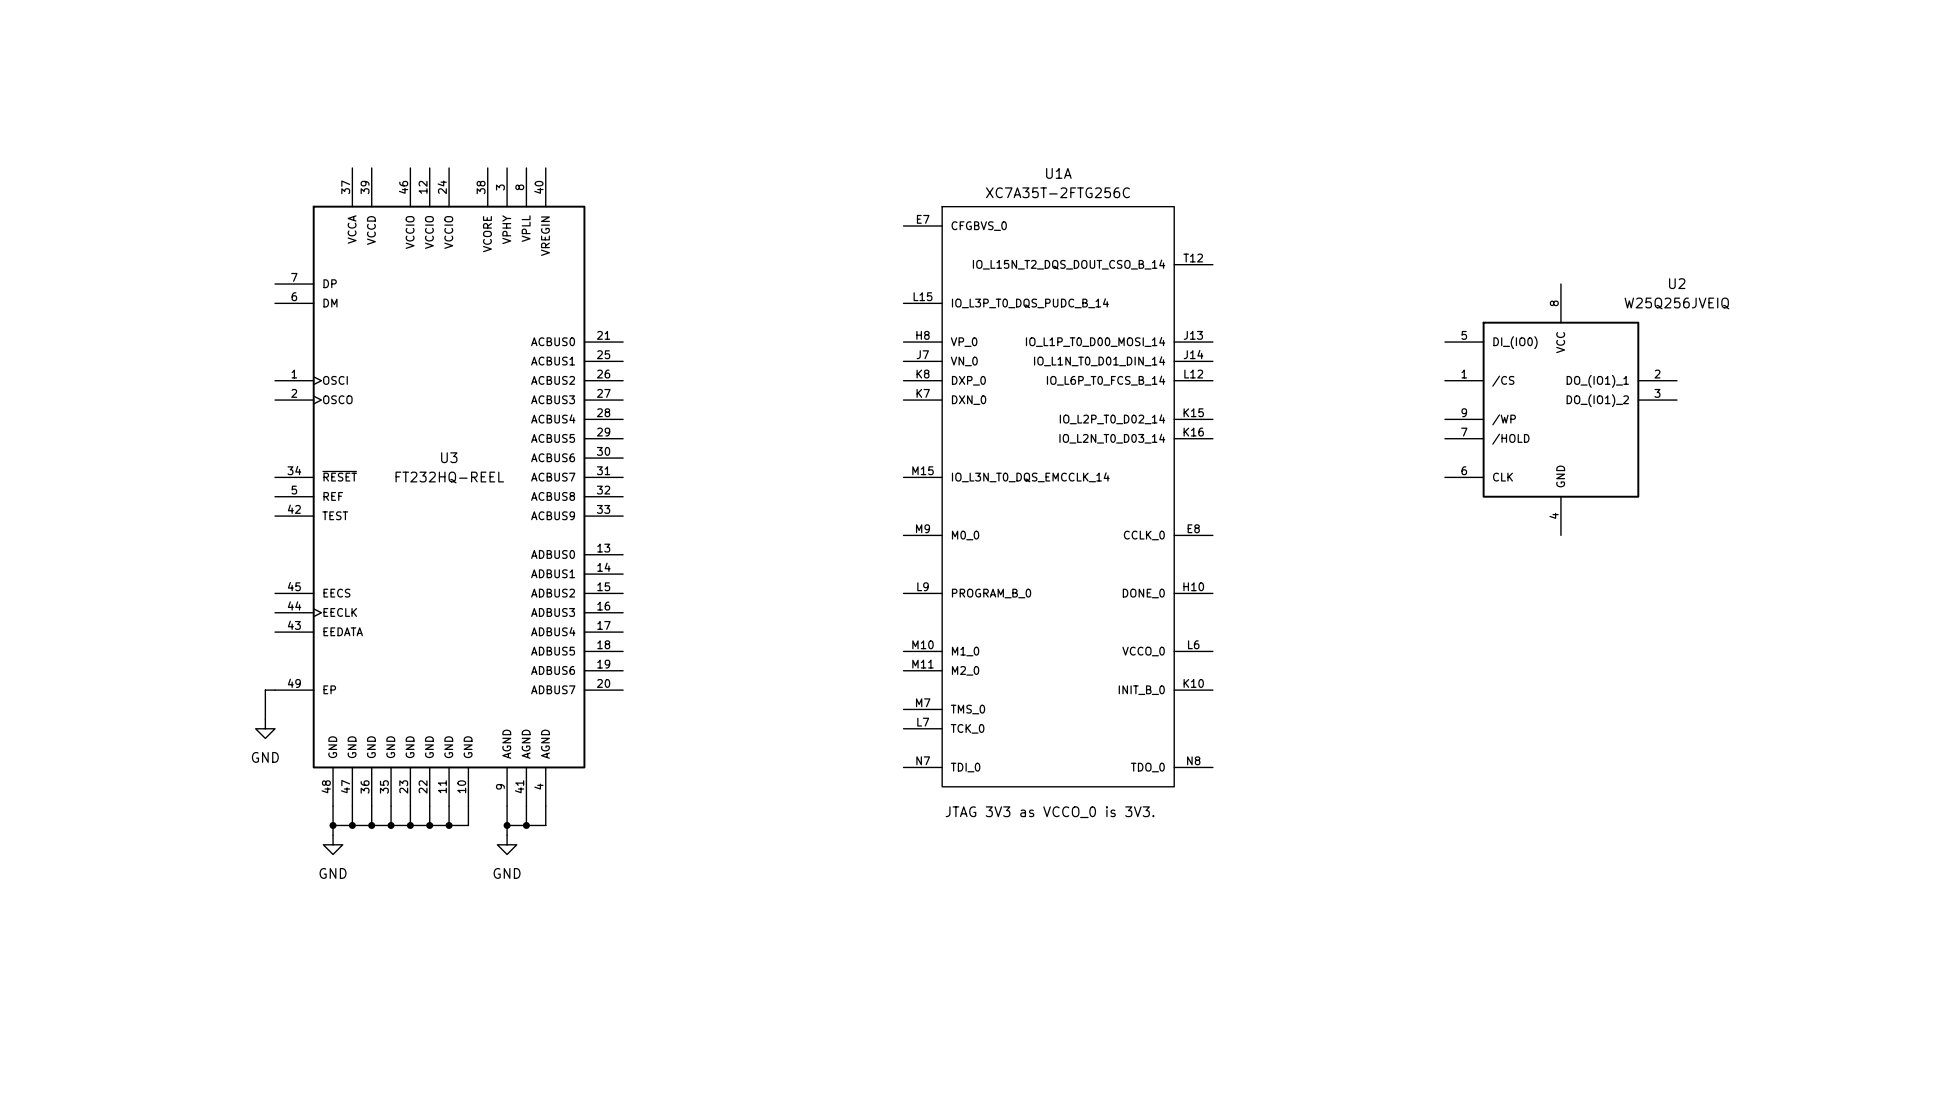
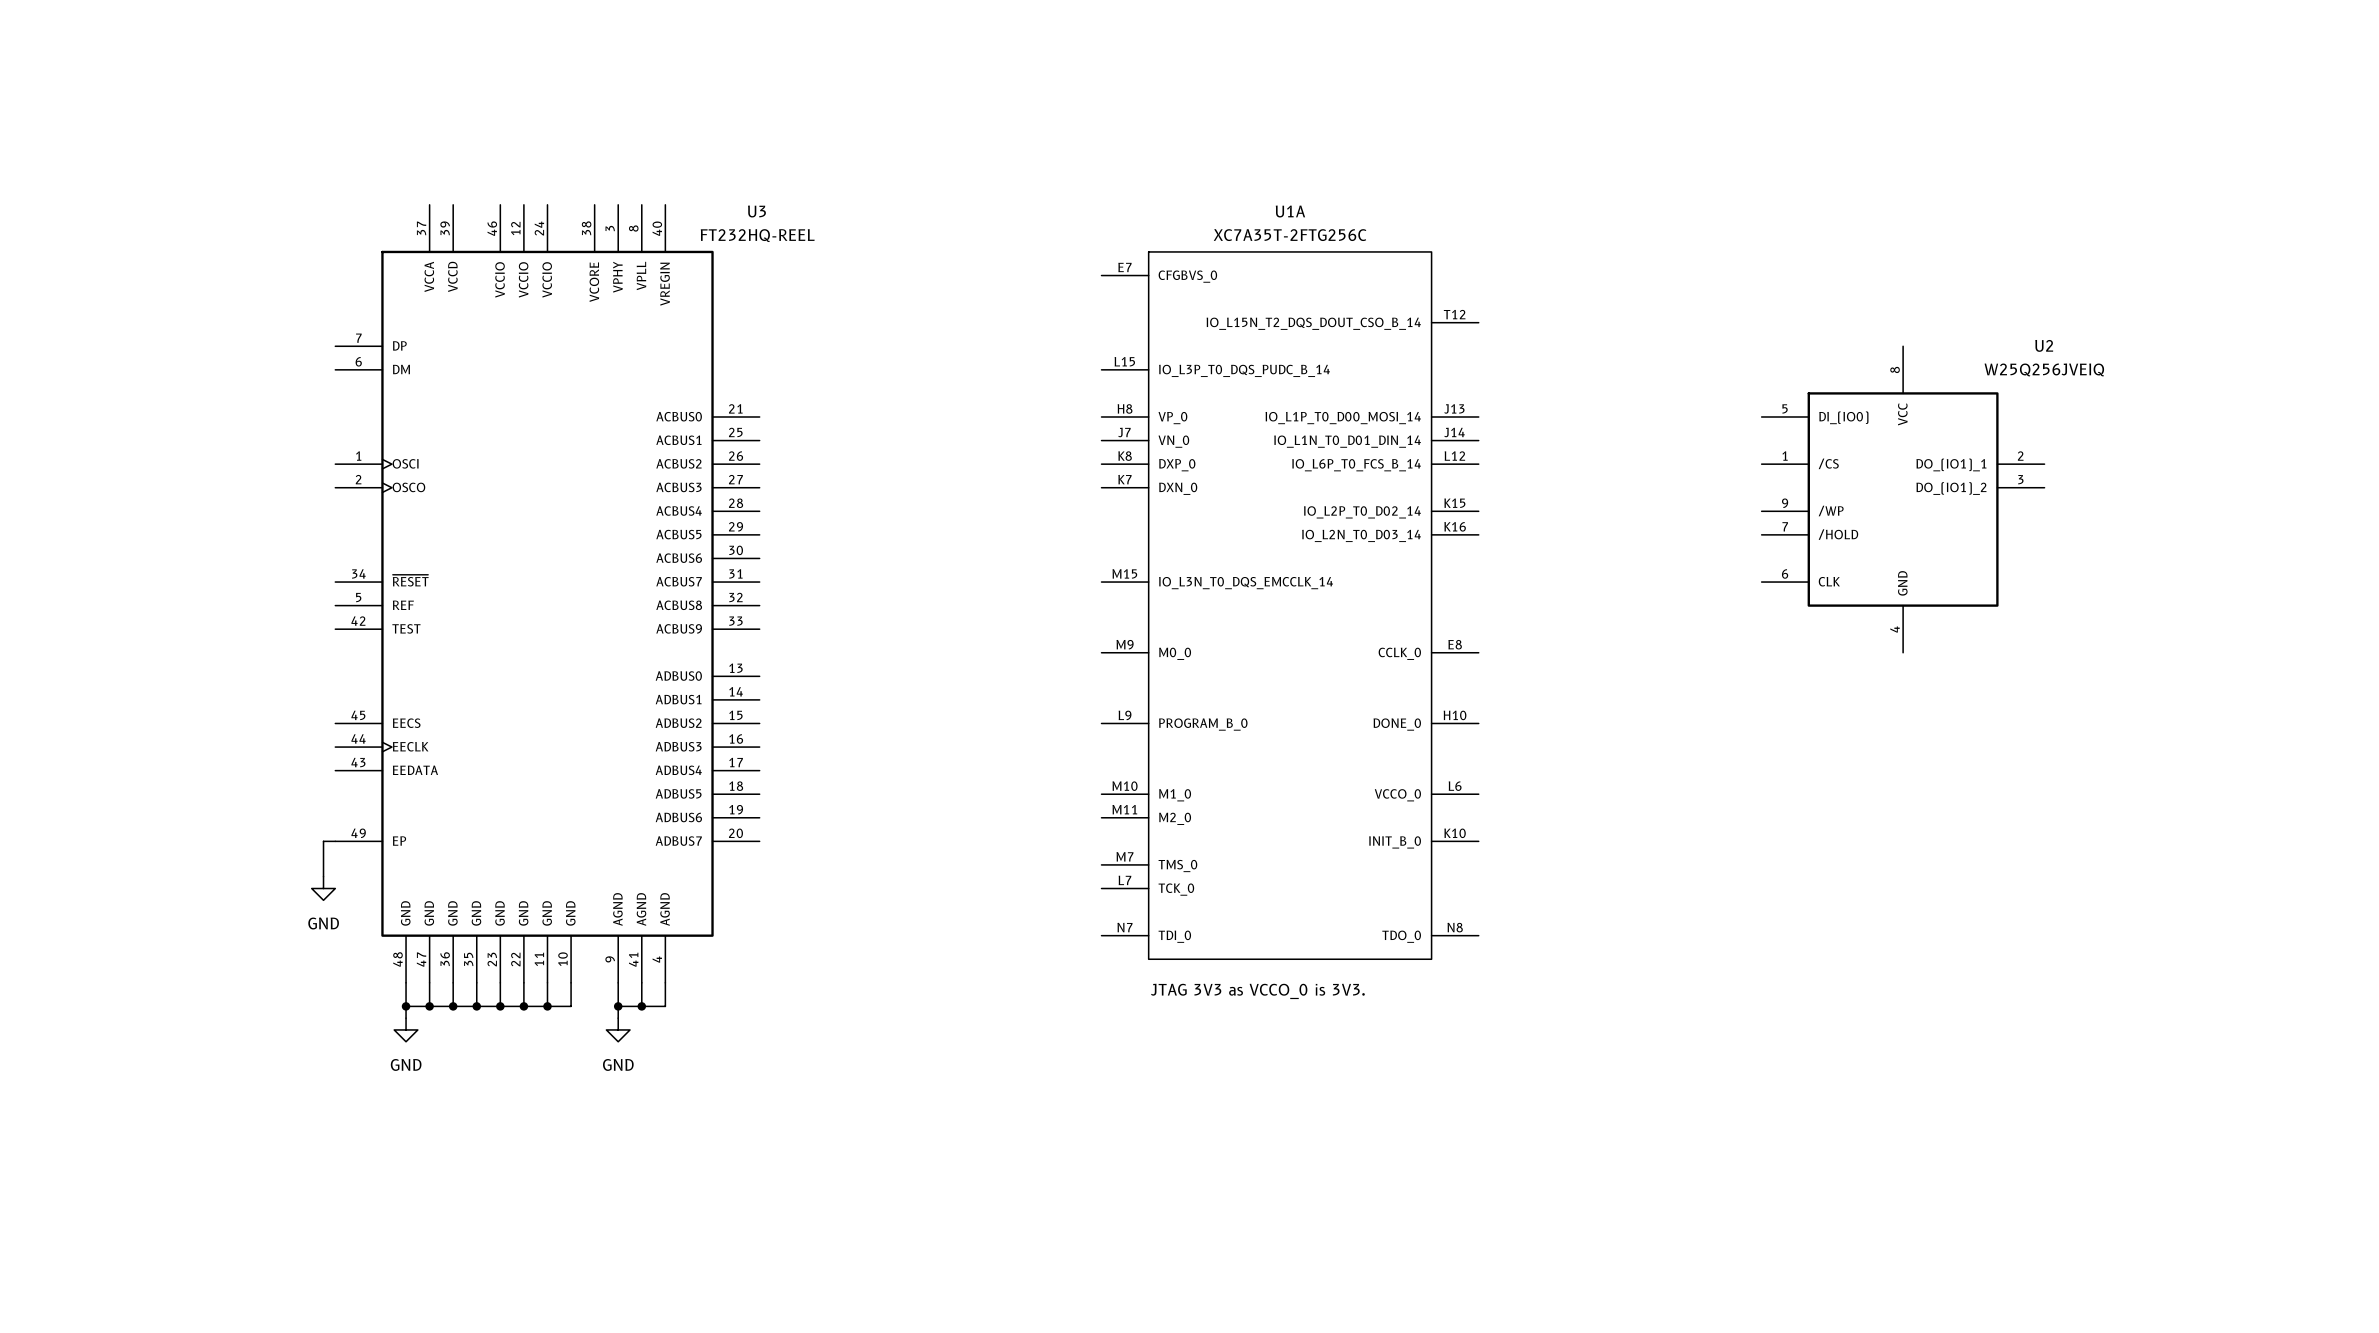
U3 name position: U3 (449, 457) -> U3 (756, 211)
U3 value position: FT232HQ-REEL (449, 477) -> FT232HQ-REEL (757, 235)

